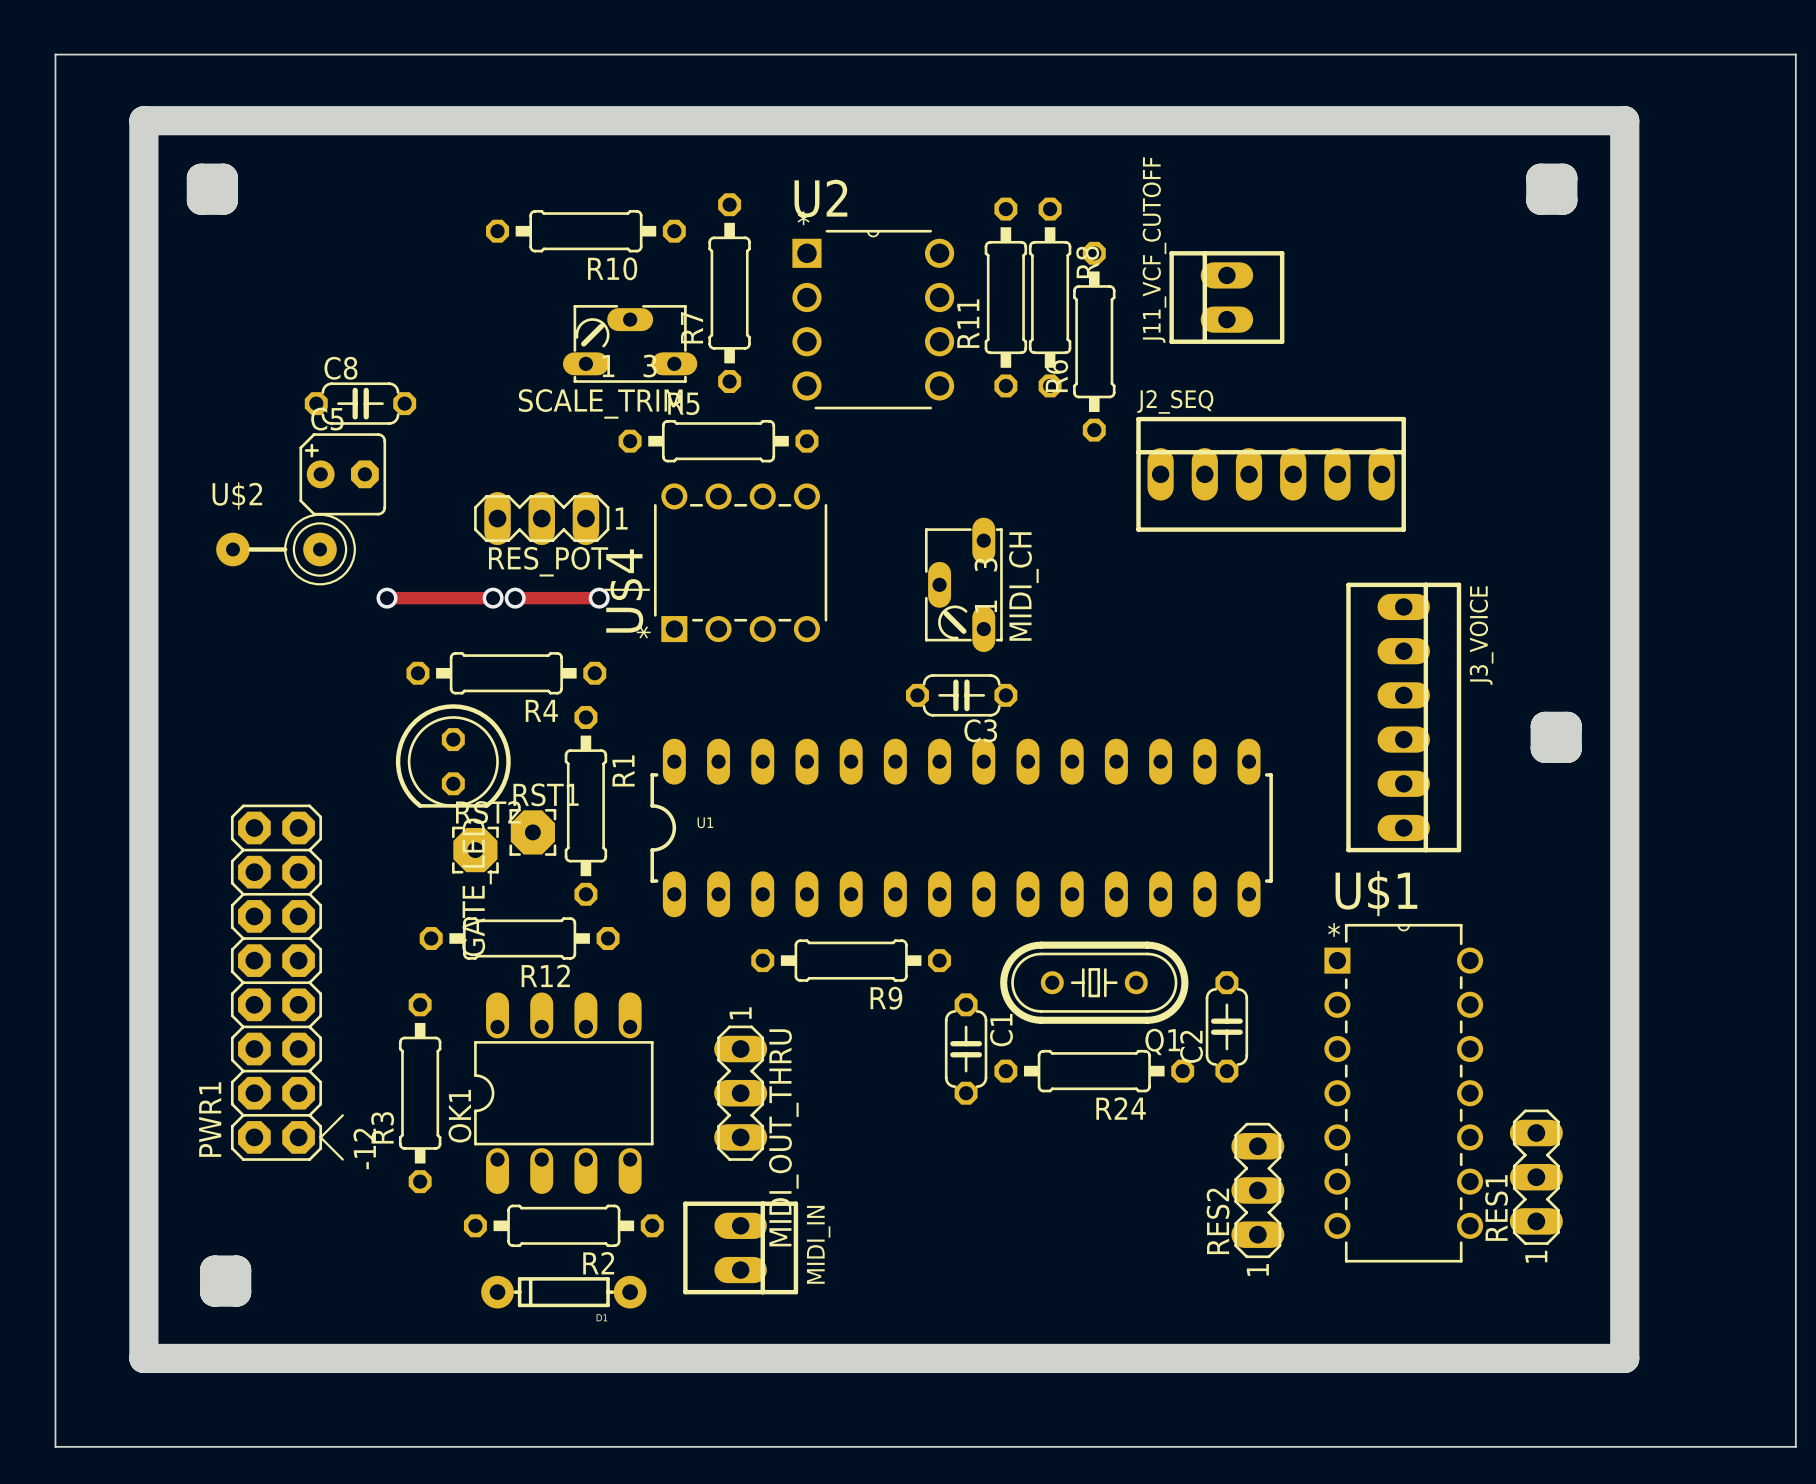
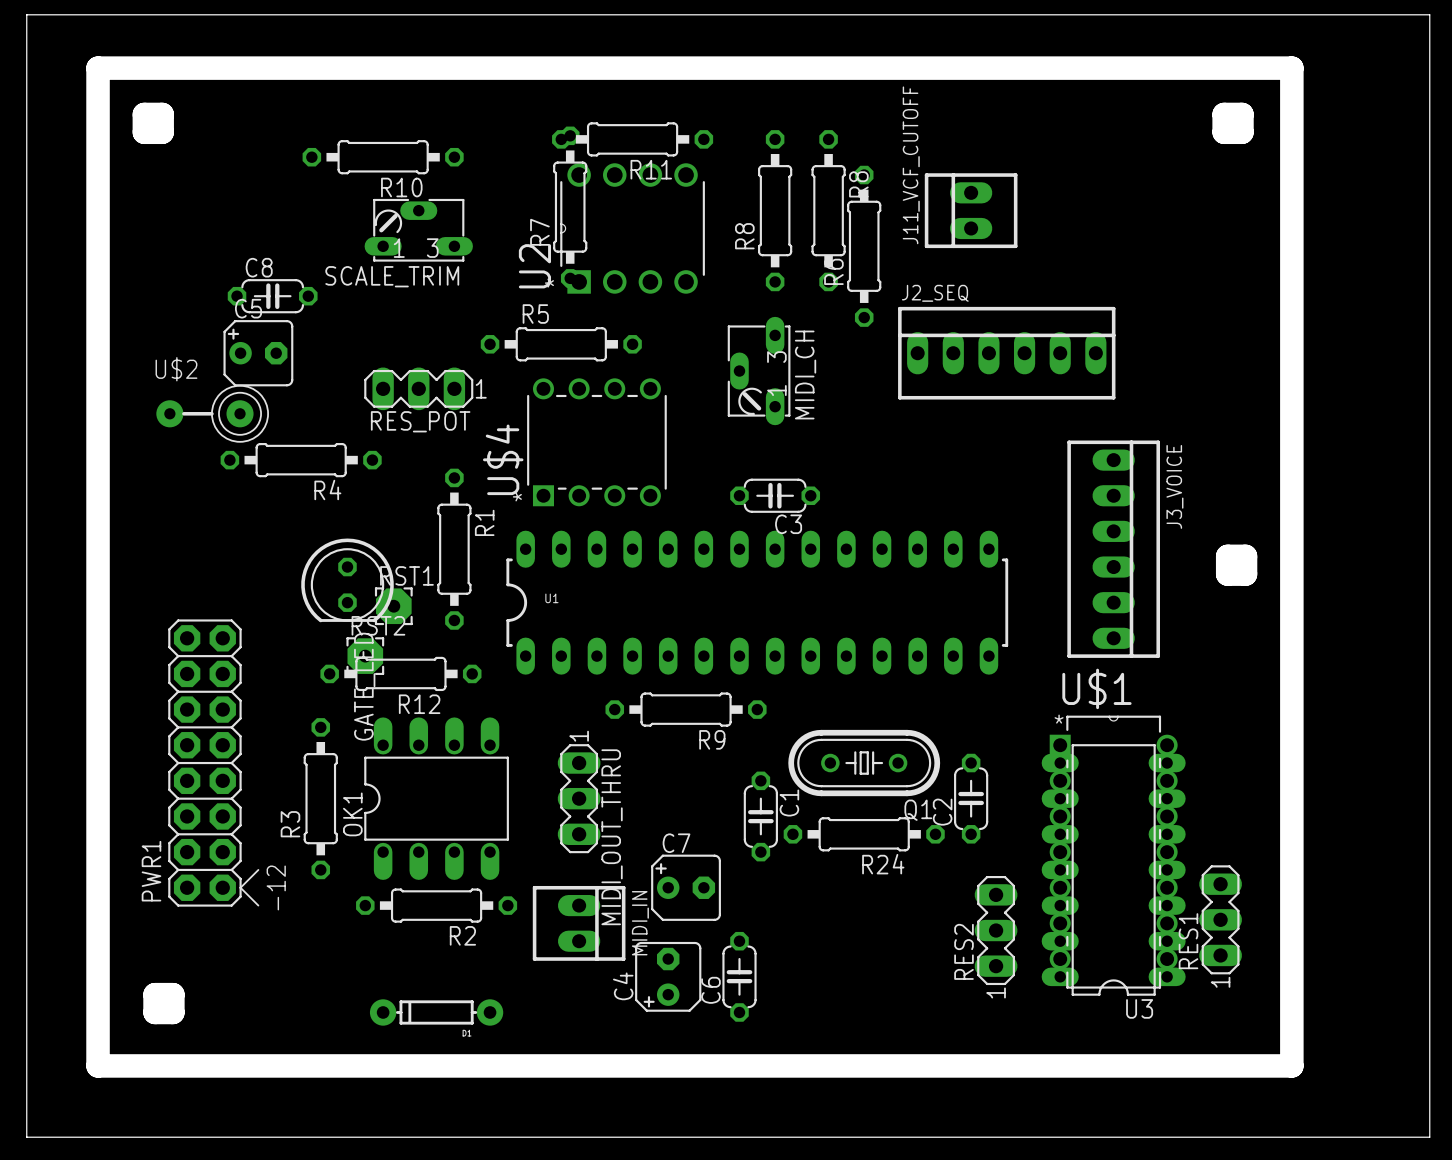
R10 position: (585, 231) -> (383, 157)
R8: none -> (775, 210)
R11 rotation: 0° (1005, 297) -> 90° clockwise (632, 139)
R11 position: (1005, 297) -> (632, 139)
U2 rotation: 0° (873, 319) -> 90° counterclockwise (632, 228)
R11 name position: R11 (968, 323) -> R11 (651, 169)
SCALE_TRIM position: (630, 343) -> (418, 230)
R5 position: (718, 441) -> (561, 344)
U$4 position: (740, 562) -> (596, 442)
MIDI_CH position: (963, 584) -> (759, 371)
track: (387, 598) (493, 598) -> none
via: (387, 598) -> none
via: (493, 598) -> none
track: (515, 598) (599, 598) -> none
via: (515, 598) -> none
via: (599, 598) -> none
R4 position: (506, 673) -> (301, 460)
C3 position: (961, 695) -> (775, 495)
R1 position: (585, 805) -> (454, 549)
U1 position: (961, 827) -> (757, 602)
RST1 position: (532, 832) -> (393, 606)
R12 position: (519, 938) -> (400, 673)
R9 position: (851, 960) -> (686, 709)
R3 position: (420, 1093) -> (320, 798)
OK1 position: (563, 1093) -> (436, 798)
MIDI_OUT_THRU position: (740, 1093) -> (579, 798)
U3: none -> (1113, 869)
C7: none -> (686, 887)
R2 position: (563, 1225) -> (436, 905)
MIDI_IN position: (740, 1247) -> (579, 923)
C4: none -> (668, 976)
C6: none -> (739, 976)

